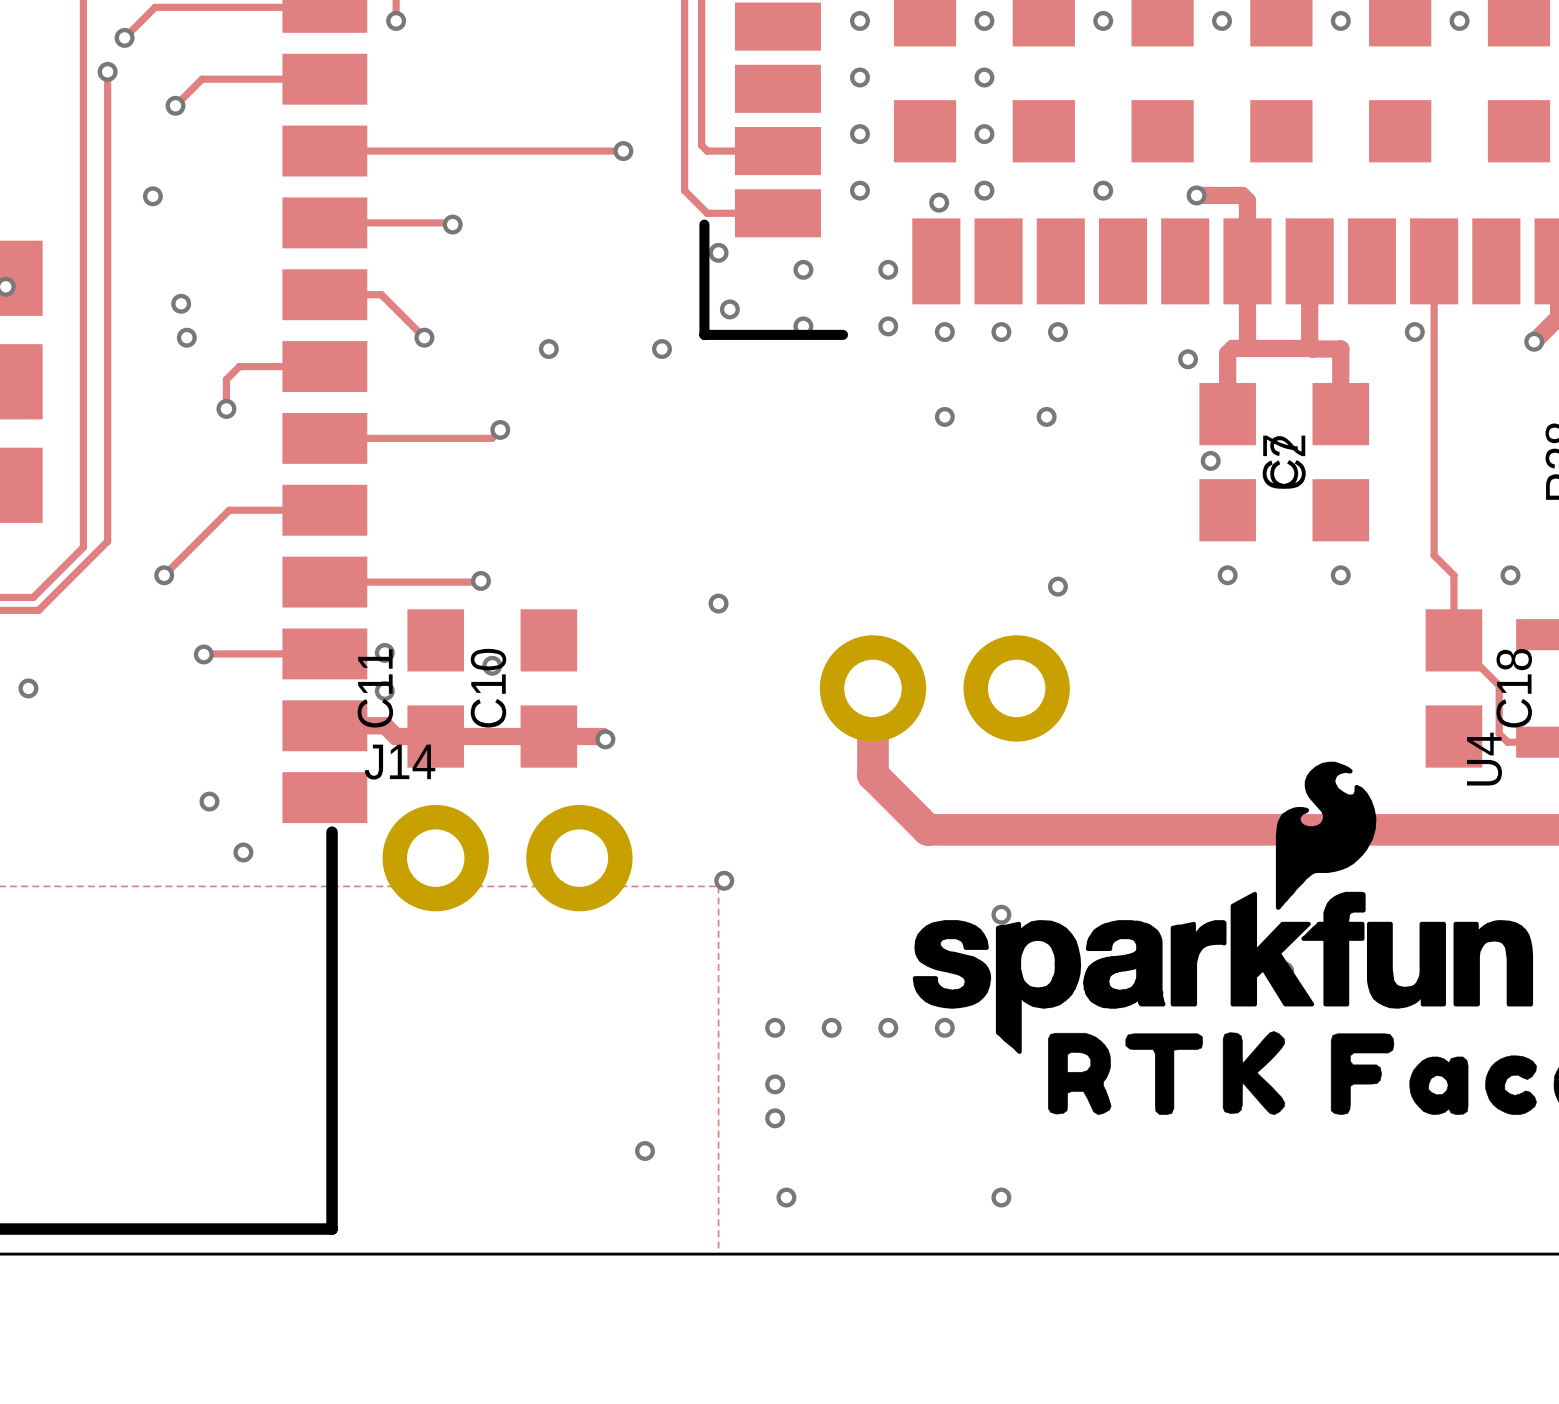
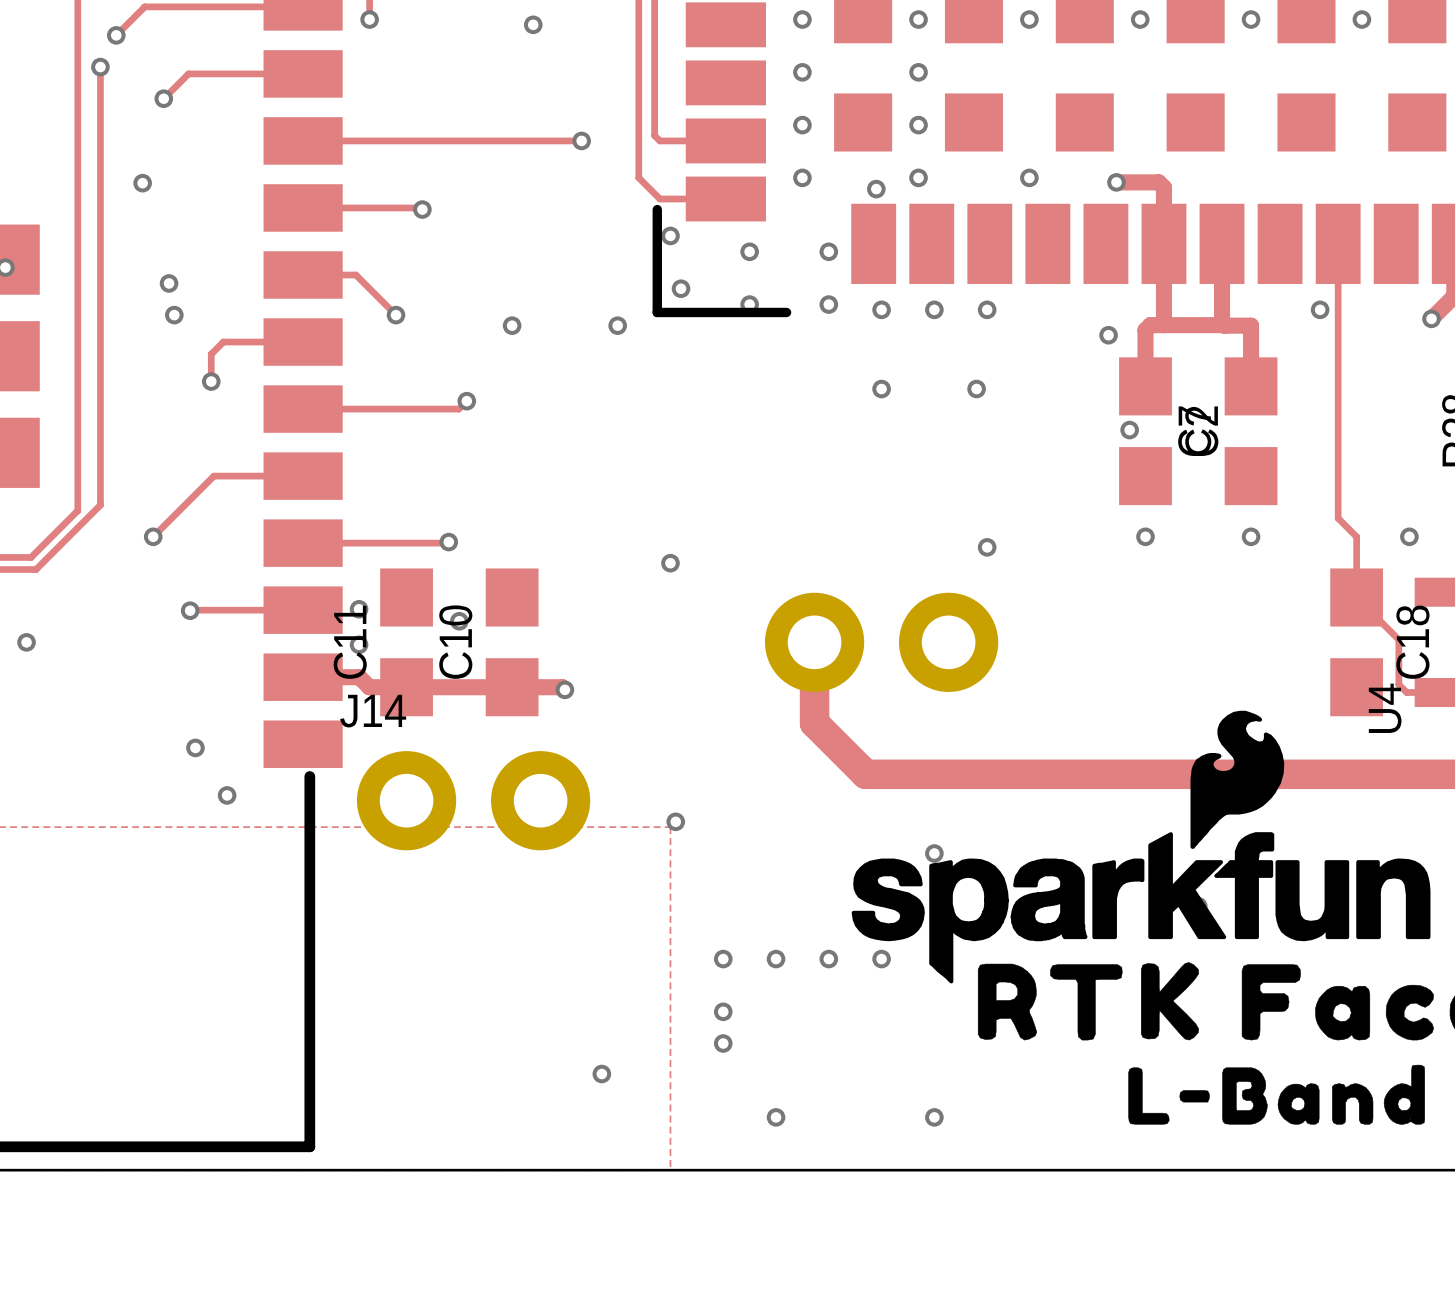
via: none -> (533, 24)
drawing: none -> [1128, 1064, 1425, 1125]
via position: (786, 1197) -> (776, 1117)

